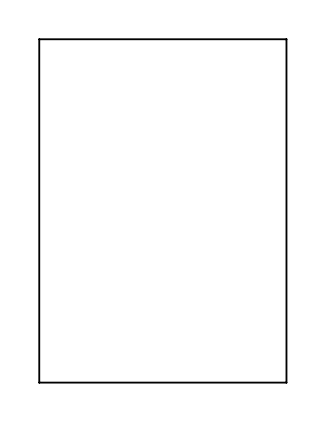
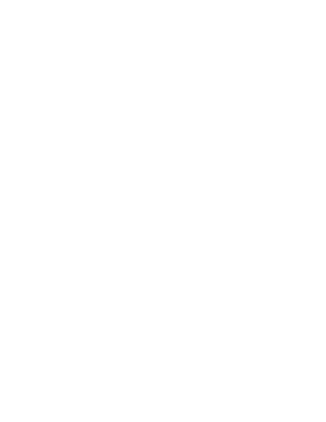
board edge: (39, 39) (286, 39) (286, 382) (39, 382) (39, 39) -> none

